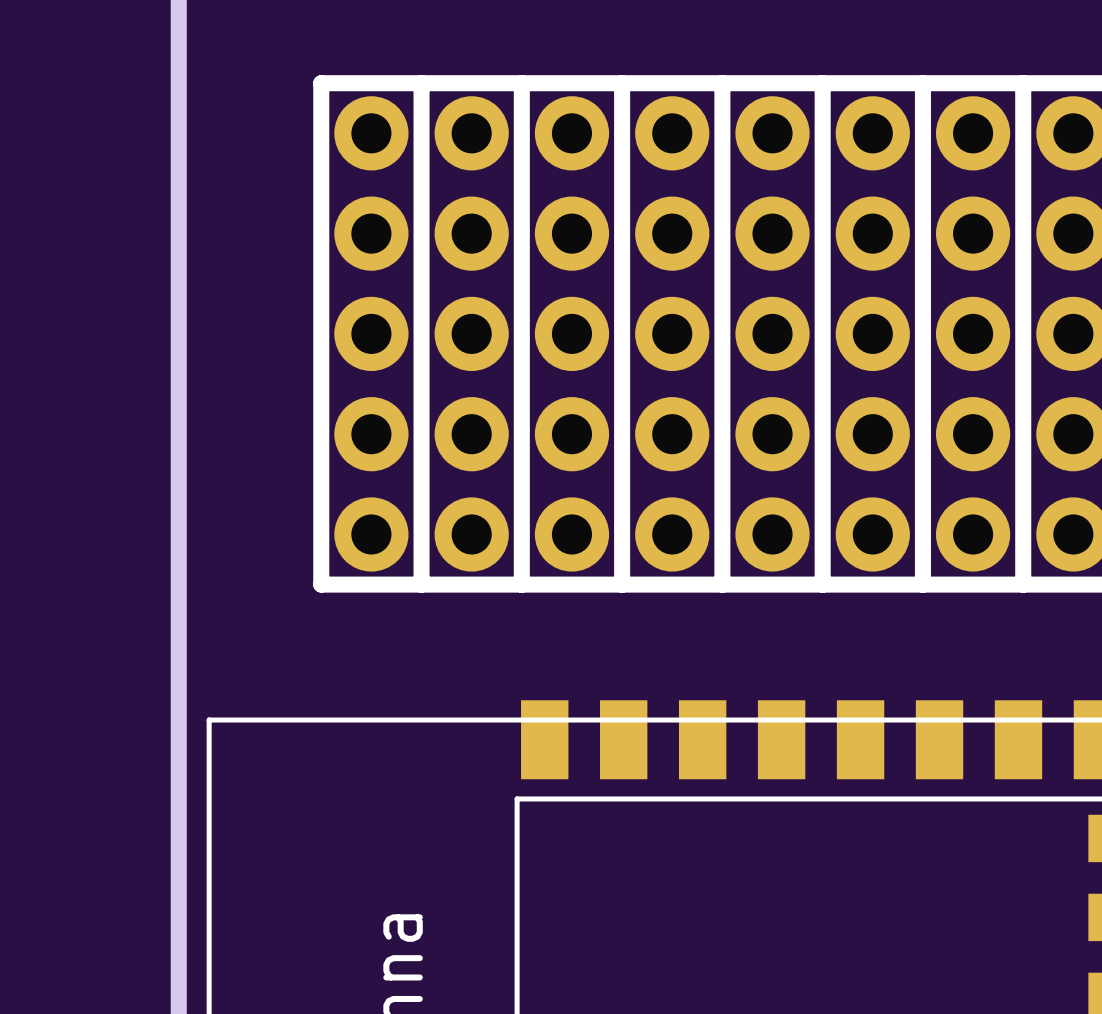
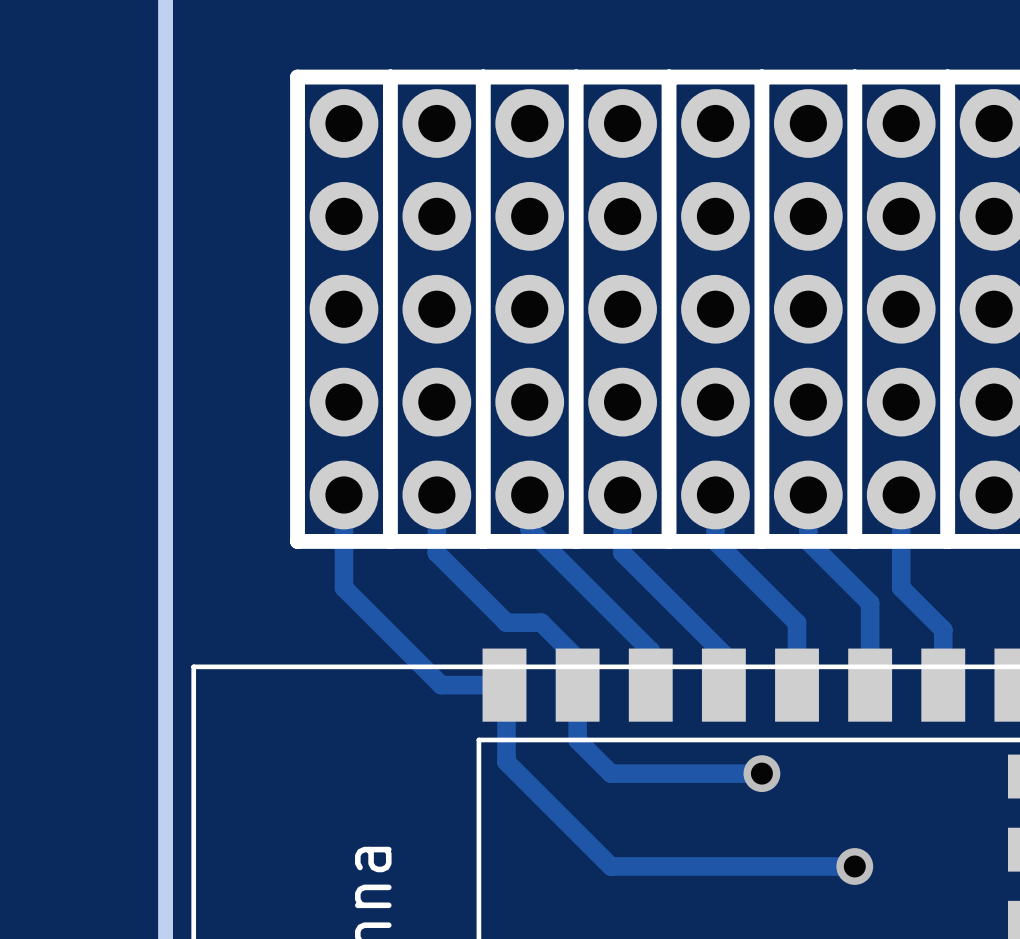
track: none -> (343, 494) (343, 587) (441, 685) (504, 685) (506, 687) (506, 762) (610, 866) (854, 866)
track: none -> (436, 494) (436, 553) (506, 622) (541, 622) (577, 658) (577, 740) (610, 773) (761, 773)
track: none -> (529, 494) (529, 529) (650, 650) (650, 685)
track: none -> (622, 494) (622, 553) (723, 654) (723, 685)
track: none -> (715, 494) (715, 541) (797, 622) (797, 685)
track: none -> (808, 494) (808, 541) (870, 603) (870, 685)
track: none -> (901, 494) (901, 587) (943, 629) (943, 685)
via: none -> (761, 773)
via: none -> (854, 866)

